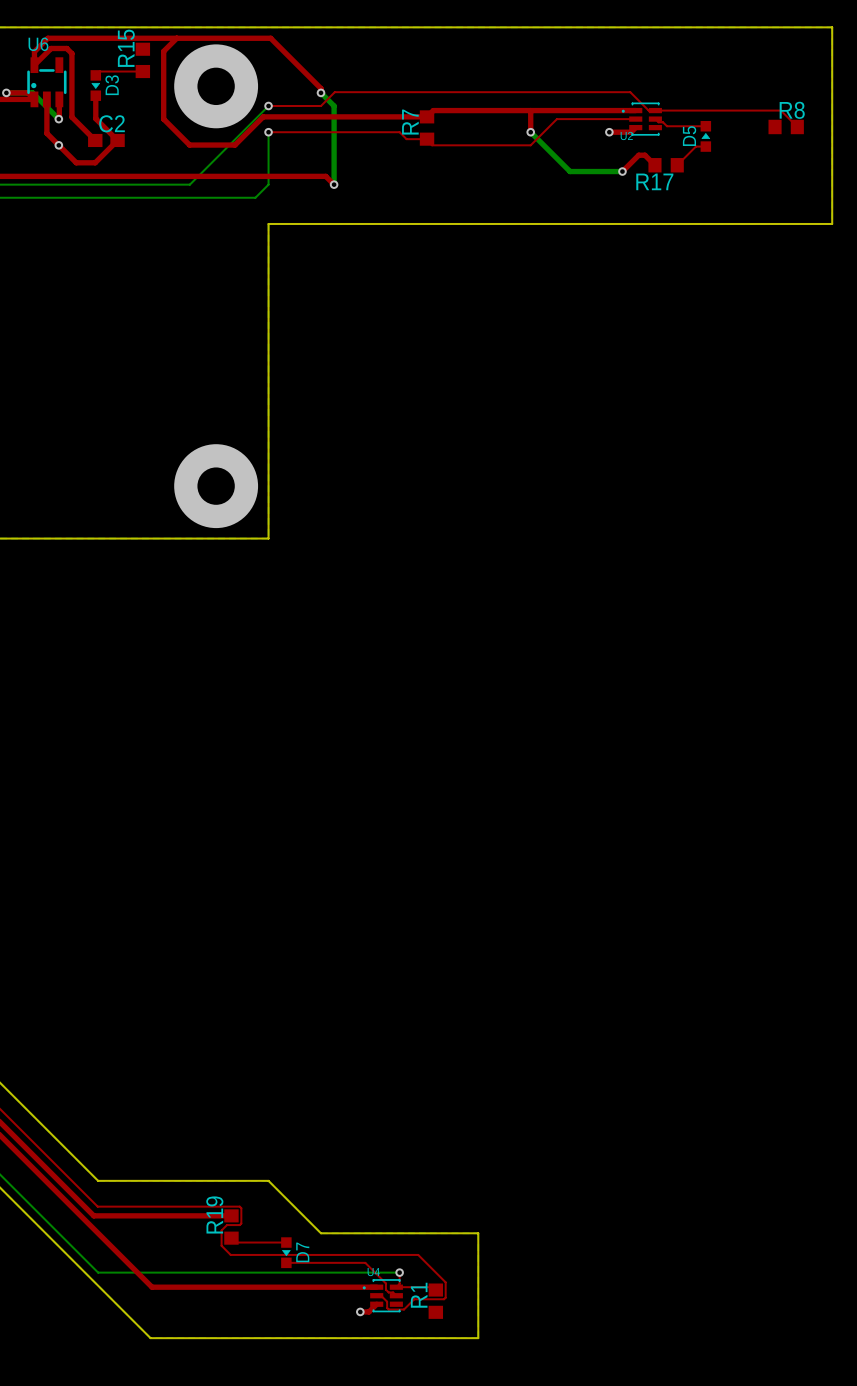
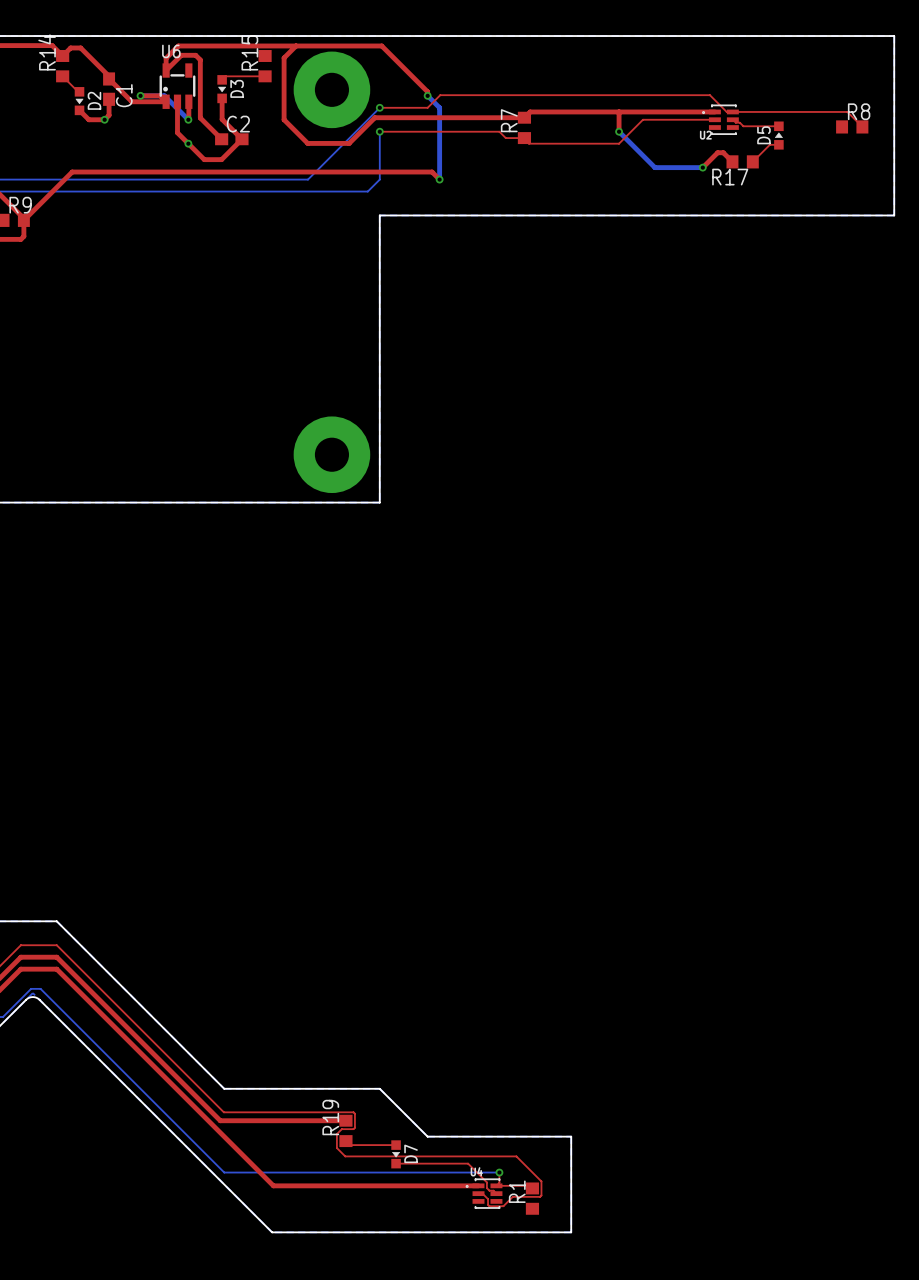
top track: (635, 127) (631, 132) (609, 132) -> none
via: (609, 132) -> none
top track: (376, 1304) (369, 1311) (360, 1311) -> none
via: (360, 1311) -> none

